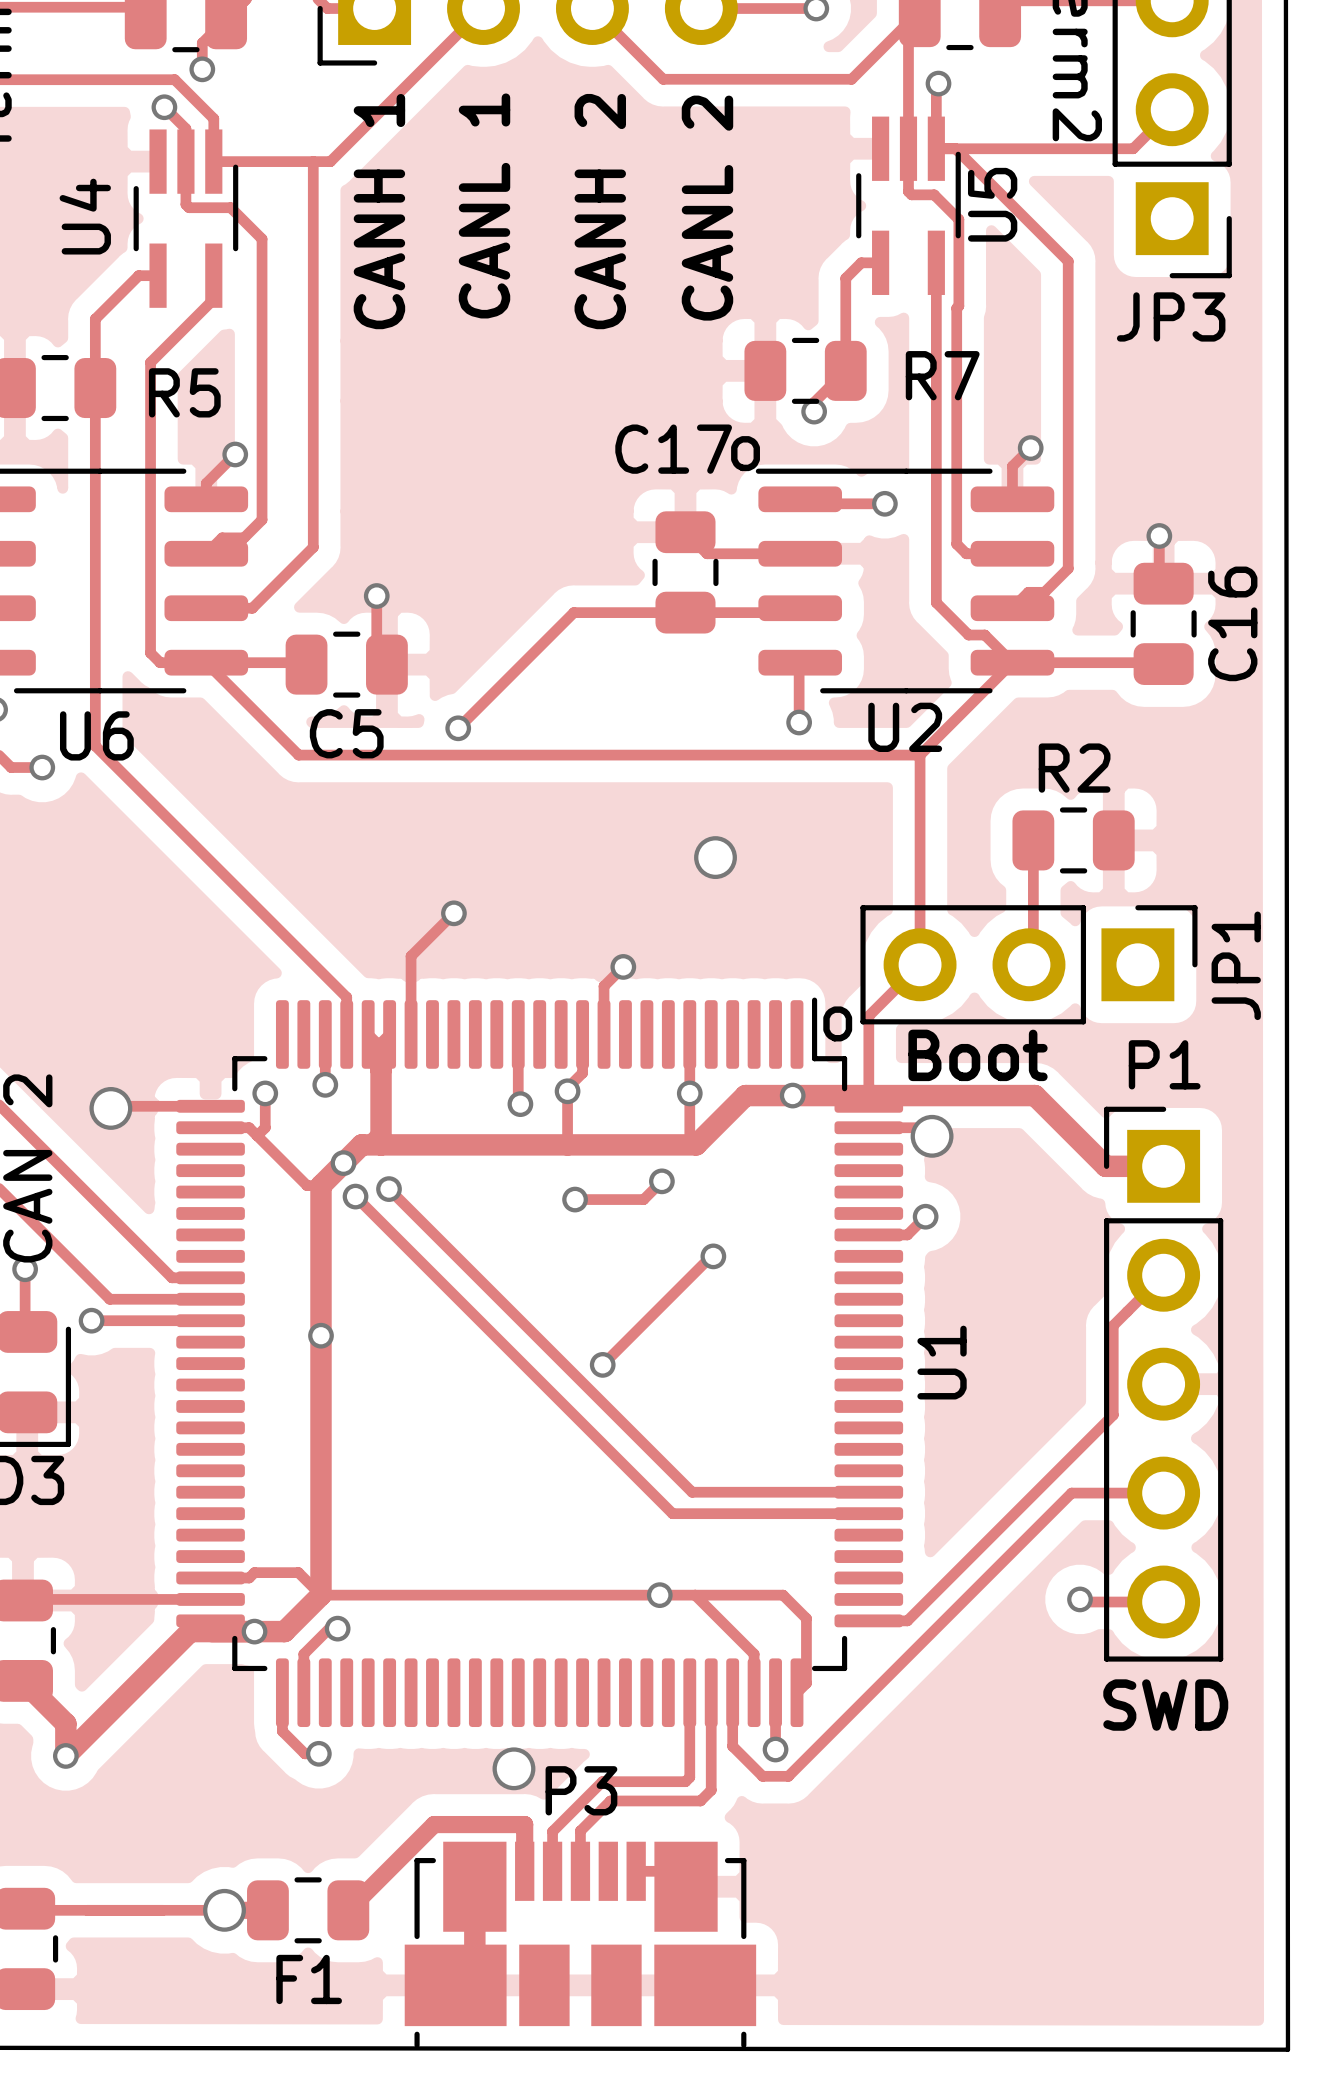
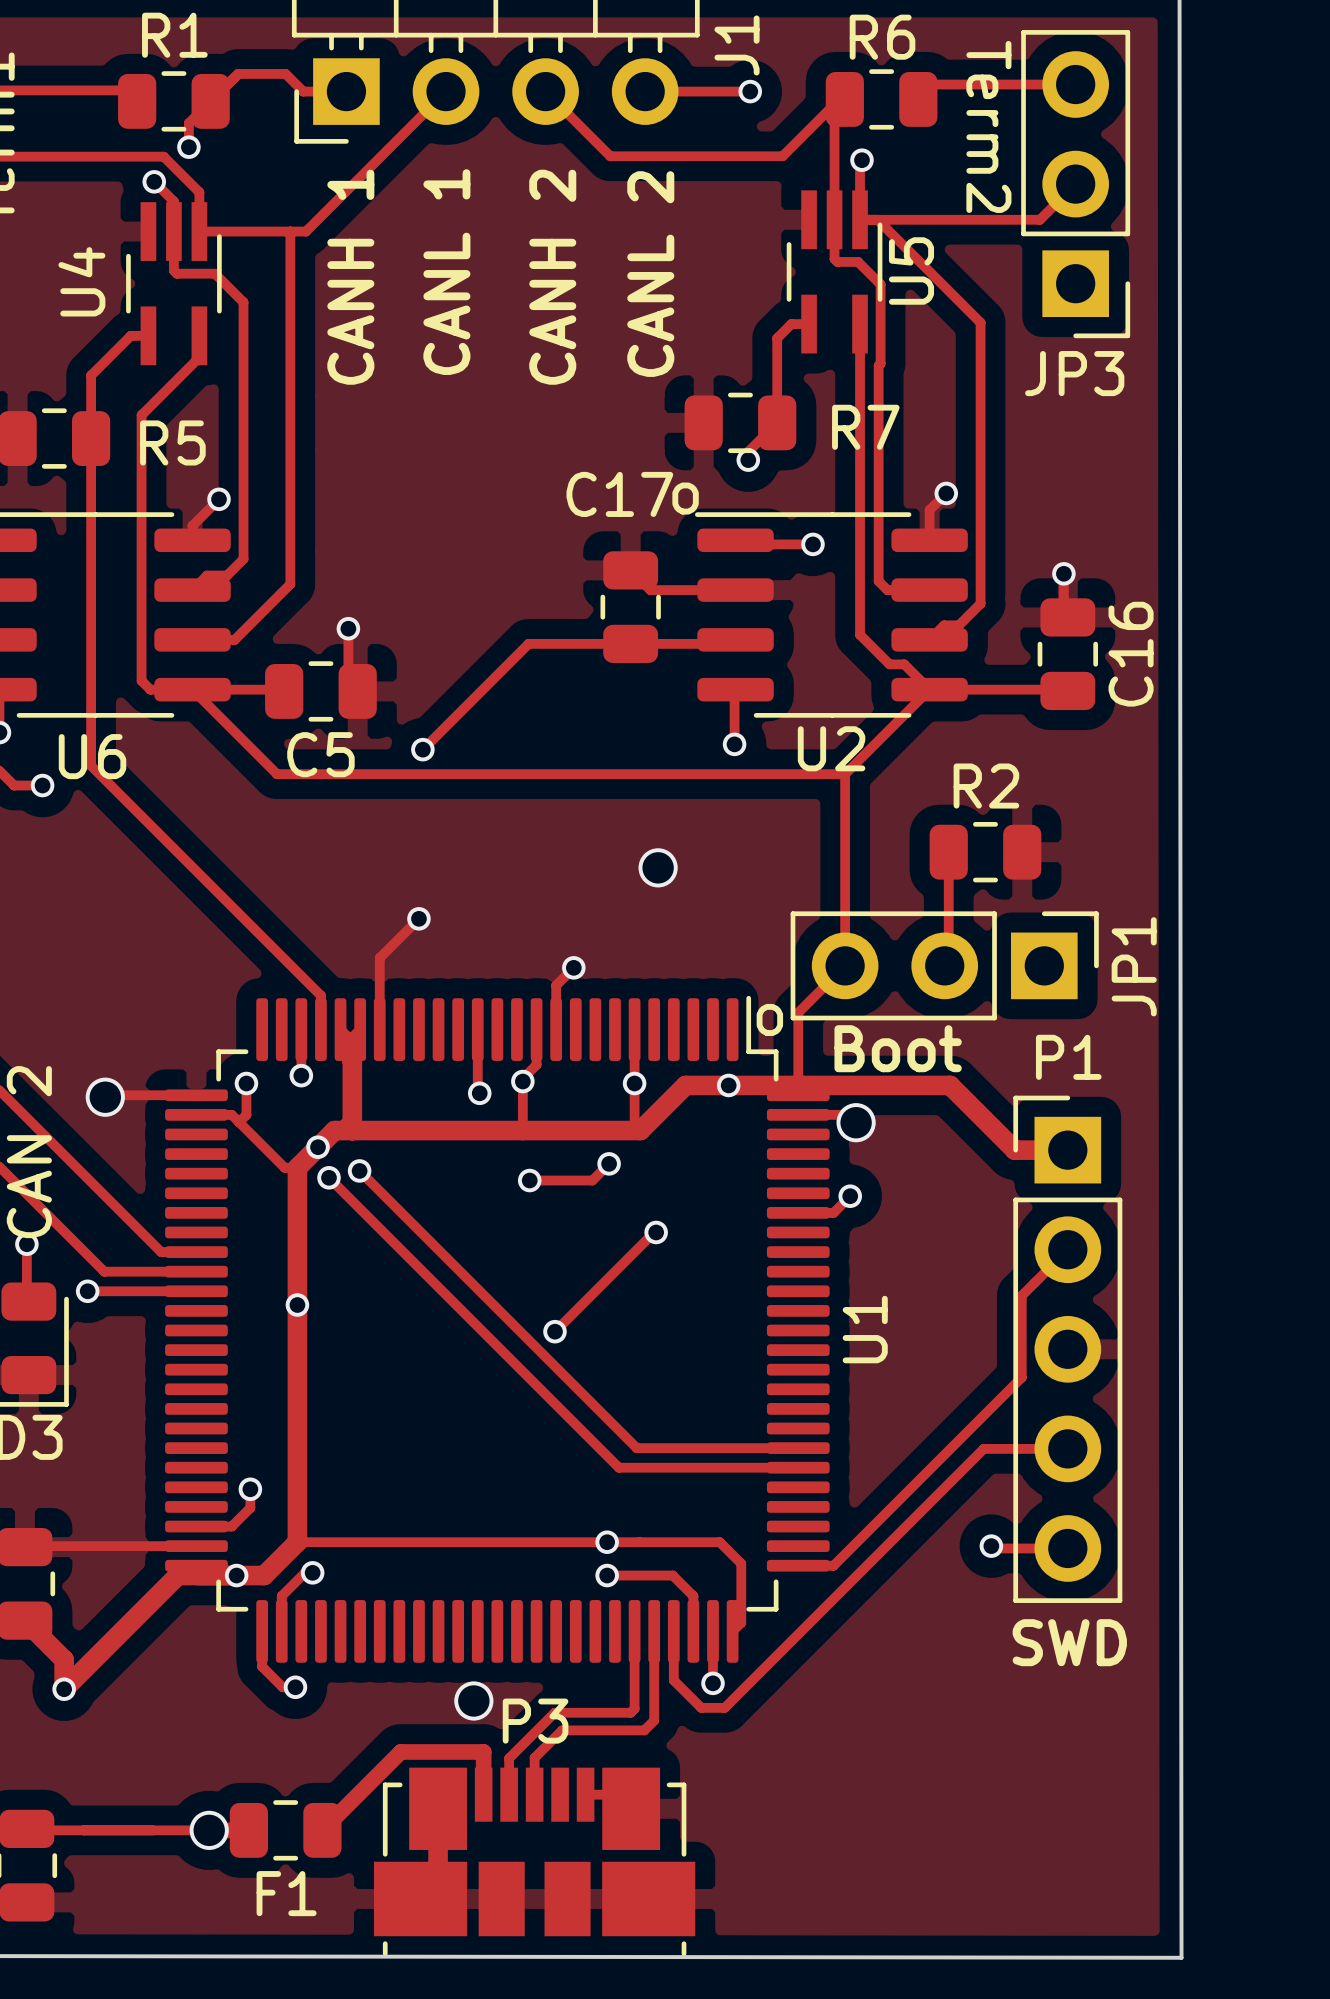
via: none -> (250, 1489)
track: (254, 1572) (298, 1572) (321, 1595) -> (236, 1521) (250, 1507) (250, 1487)
track: (695, 1595) (731, 1631) -> (607, 1575) (672, 1575)
via: none -> (607, 1575)

